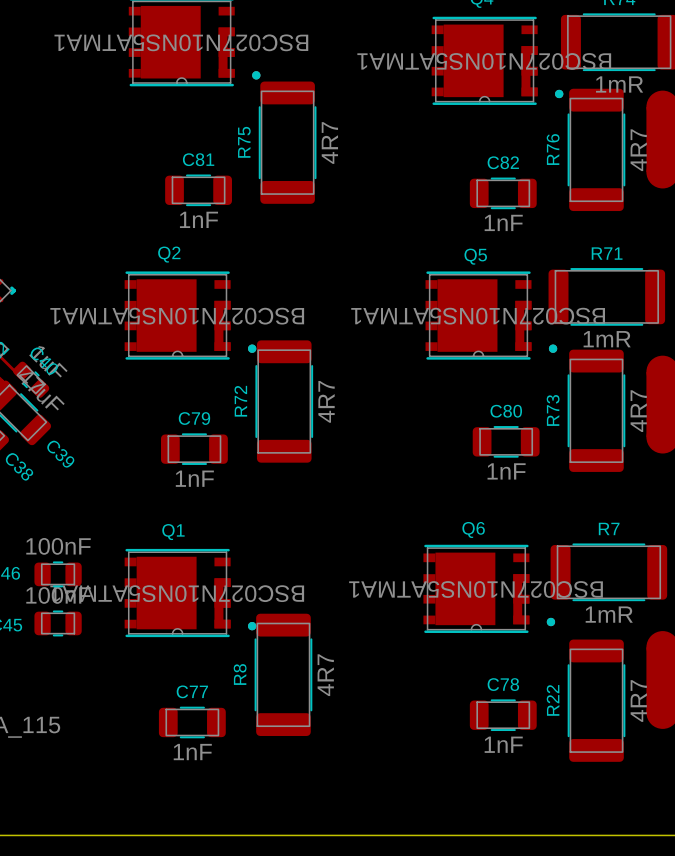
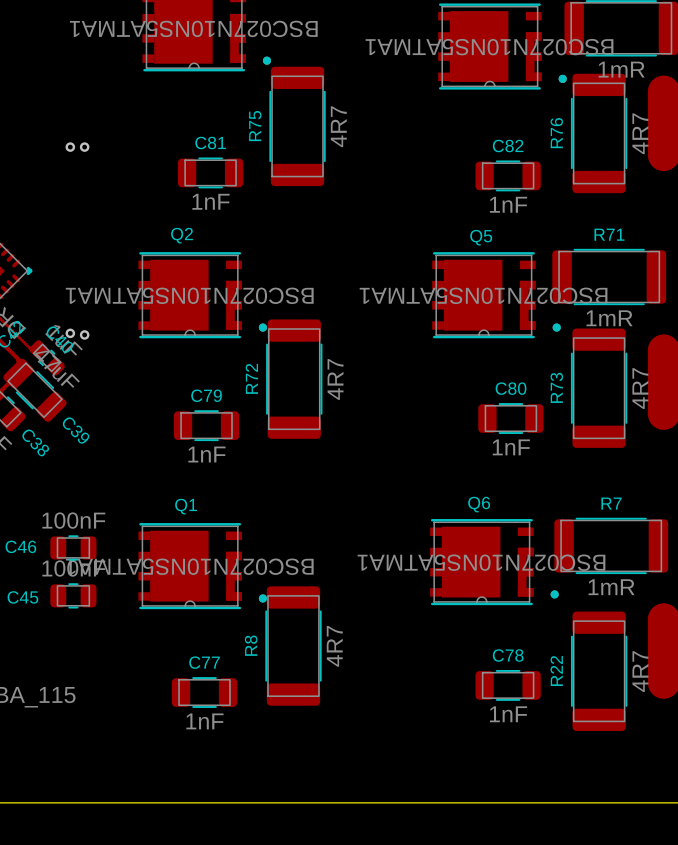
via: none -> (70, 147)
via: none -> (84, 147)
via: none -> (70, 333)
via: none -> (84, 334)

